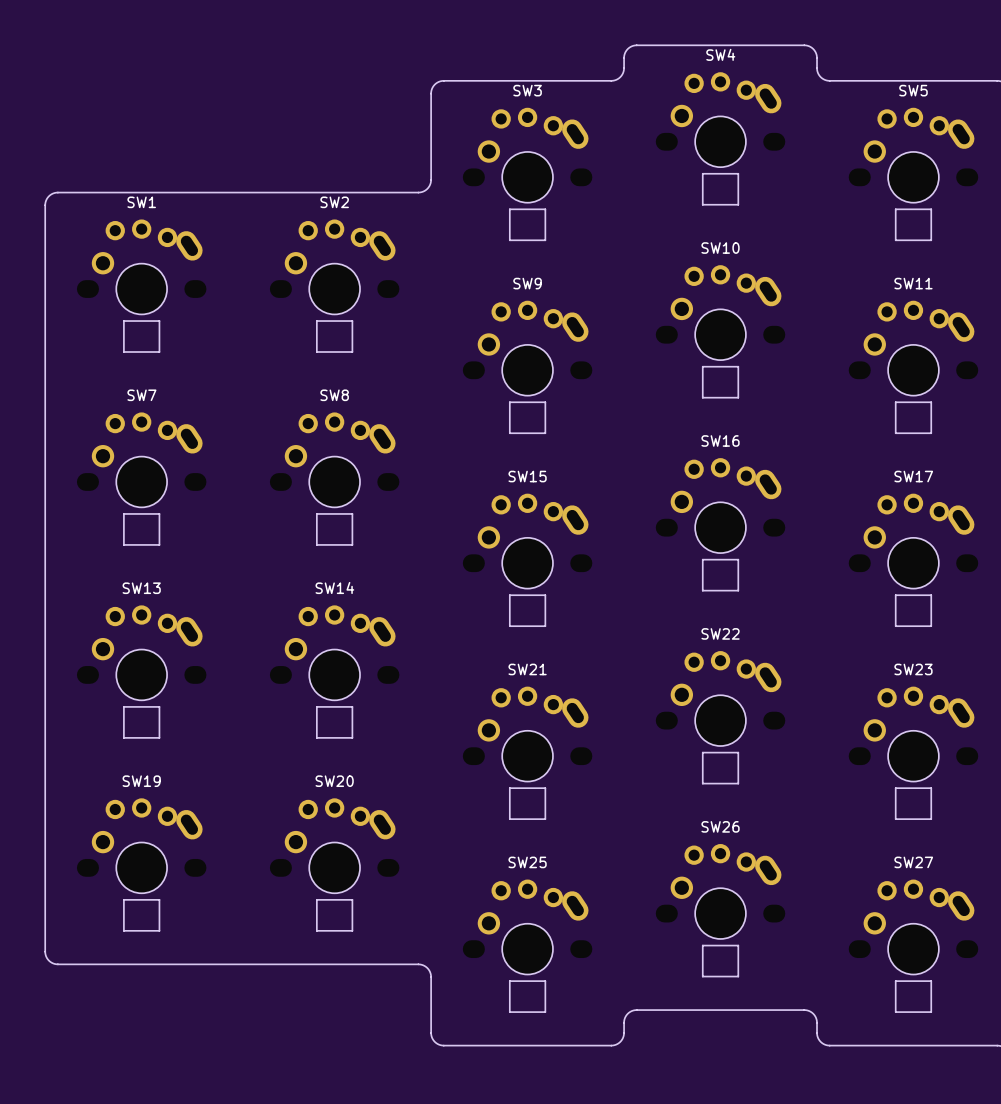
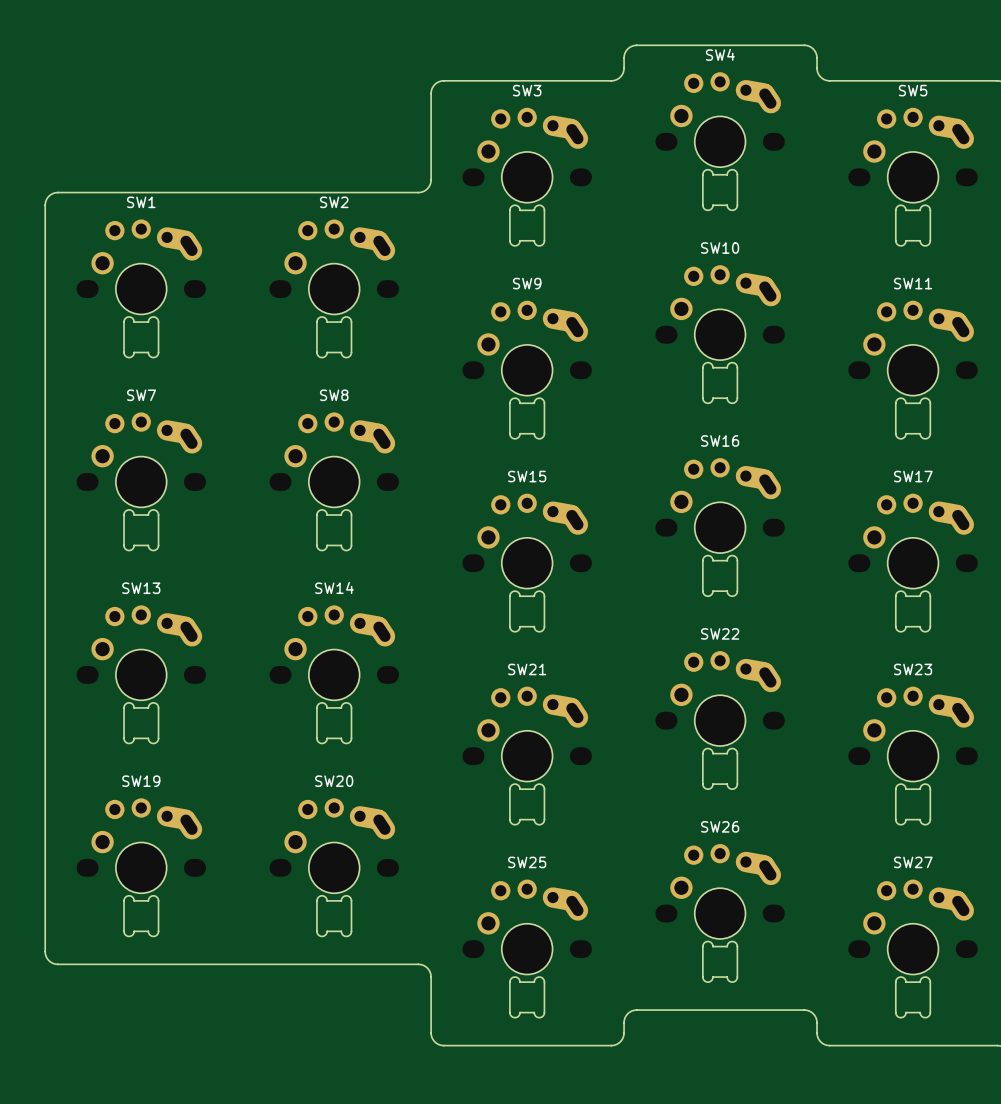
SW4 footprint: [655, 72, 786, 206] -> [655, 72, 785, 168]
SW3 footprint: [462, 107, 593, 241] -> [462, 107, 592, 203]
SW5 footprint: [848, 107, 979, 241] -> [848, 107, 978, 203]
part: none -> (720, 190)
SW1 footprint: [76, 219, 207, 353] -> [76, 219, 207, 315]
SW2 footprint: [269, 219, 400, 353] -> [269, 219, 399, 315]
part: none -> (527, 225)
part: none -> (913, 225)
SW10 footprint: [655, 265, 786, 399] -> [655, 265, 785, 361]
SW9 footprint: [462, 300, 593, 434] -> [462, 300, 592, 396]
SW11 footprint: [848, 300, 979, 434] -> [848, 300, 978, 396]
part: none -> (141, 337)
part: none -> (334, 337)
part: none -> (720, 382)
SW7 footprint: [76, 412, 207, 546] -> [76, 412, 207, 508]
SW8 footprint: [269, 412, 400, 546] -> [269, 412, 399, 508]
part: none -> (527, 418)
part: none -> (913, 418)
SW16 footprint: [655, 458, 786, 592] -> [655, 458, 785, 554]
SW15 footprint: [462, 493, 593, 627] -> [462, 493, 592, 589]
SW17 footprint: [848, 493, 979, 627] -> [848, 493, 978, 589]
part: none -> (141, 530)
part: none -> (334, 530)
part: none -> (720, 575)
SW13 footprint: [76, 605, 207, 739] -> [76, 605, 207, 701]
SW14 footprint: [269, 605, 400, 739] -> [269, 605, 399, 701]
part: none -> (527, 611)
part: none -> (913, 611)
SW22 footprint: [655, 651, 786, 785] -> [655, 651, 785, 747]
SW21 footprint: [462, 686, 593, 820] -> [462, 686, 592, 782]
SW23 footprint: [848, 686, 979, 820] -> [848, 686, 978, 782]
part: none -> (141, 723)
part: none -> (334, 723)
part: none -> (720, 768)
SW19 footprint: [76, 798, 207, 932] -> [76, 798, 207, 894]
SW20 footprint: [269, 798, 400, 932] -> [269, 798, 399, 894]
part: none -> (527, 804)
part: none -> (913, 804)
SW26 footprint: [655, 844, 786, 978] -> [655, 844, 785, 939]
SW25 footprint: [462, 879, 593, 1013] -> [462, 879, 592, 975]
SW27 footprint: [848, 879, 979, 1013] -> [848, 879, 978, 975]
part: none -> (141, 916)
part: none -> (334, 916)
part: none -> (720, 961)
part: none -> (527, 997)
part: none -> (913, 997)

